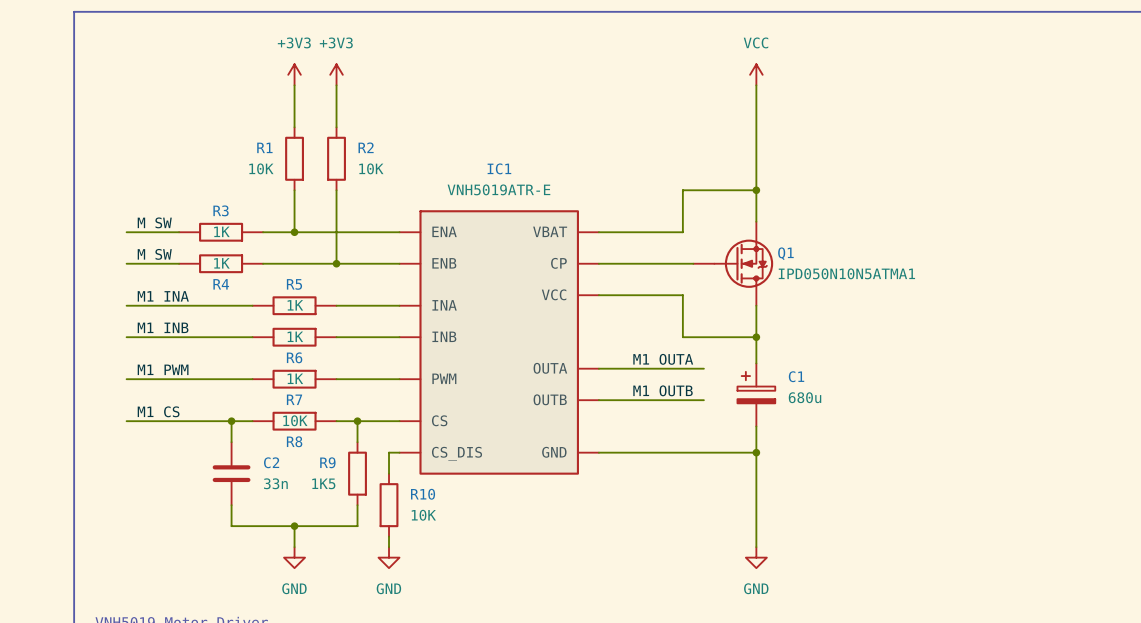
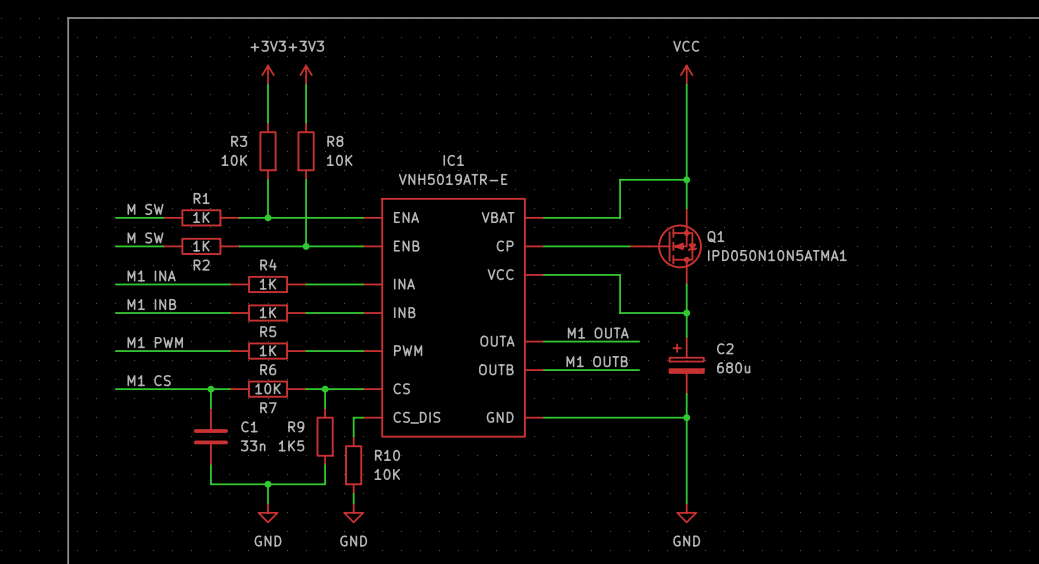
R1 name: R1 (264, 147) -> R3 (239, 141)
R2 name: R2 (366, 147) -> R8 (335, 141)
R3 name: R3 (221, 210) -> R1 (201, 198)
R4 name: R4 (221, 284) -> R2 (201, 265)
R5 name: R5 (294, 284) -> R4 (268, 264)
R6 name: R6 (294, 357) -> R5 (268, 331)
C1 name: C1 (796, 376) -> C2 (725, 348)
R7 name: R7 (294, 399) -> R6 (268, 369)
R8 name: R8 (294, 441) -> R7 (268, 407)
C2 name: C2 (271, 462) -> C1 (249, 426)

